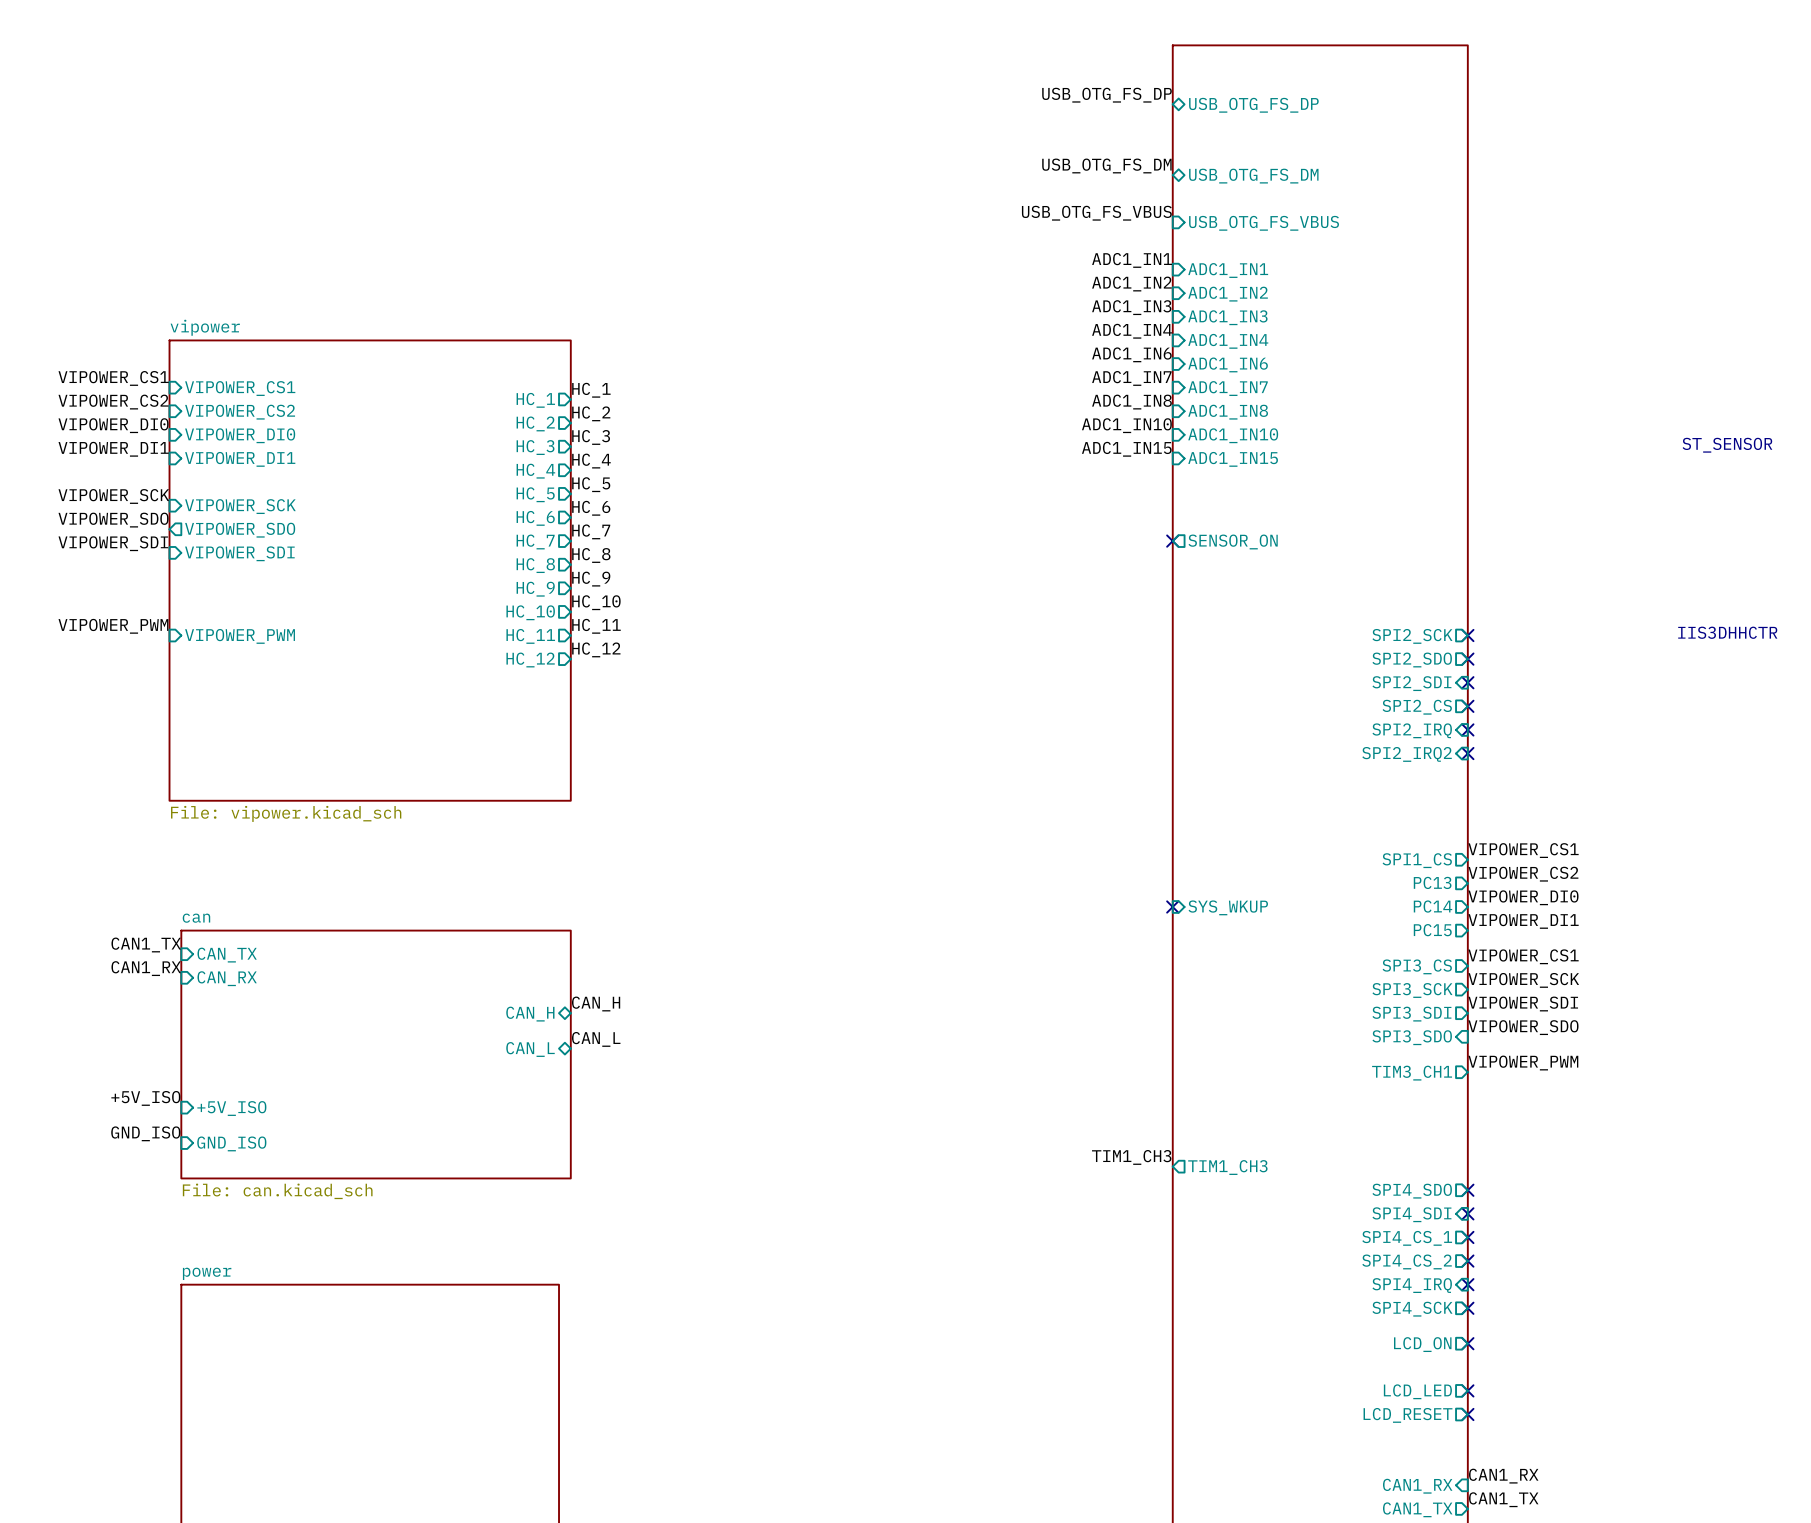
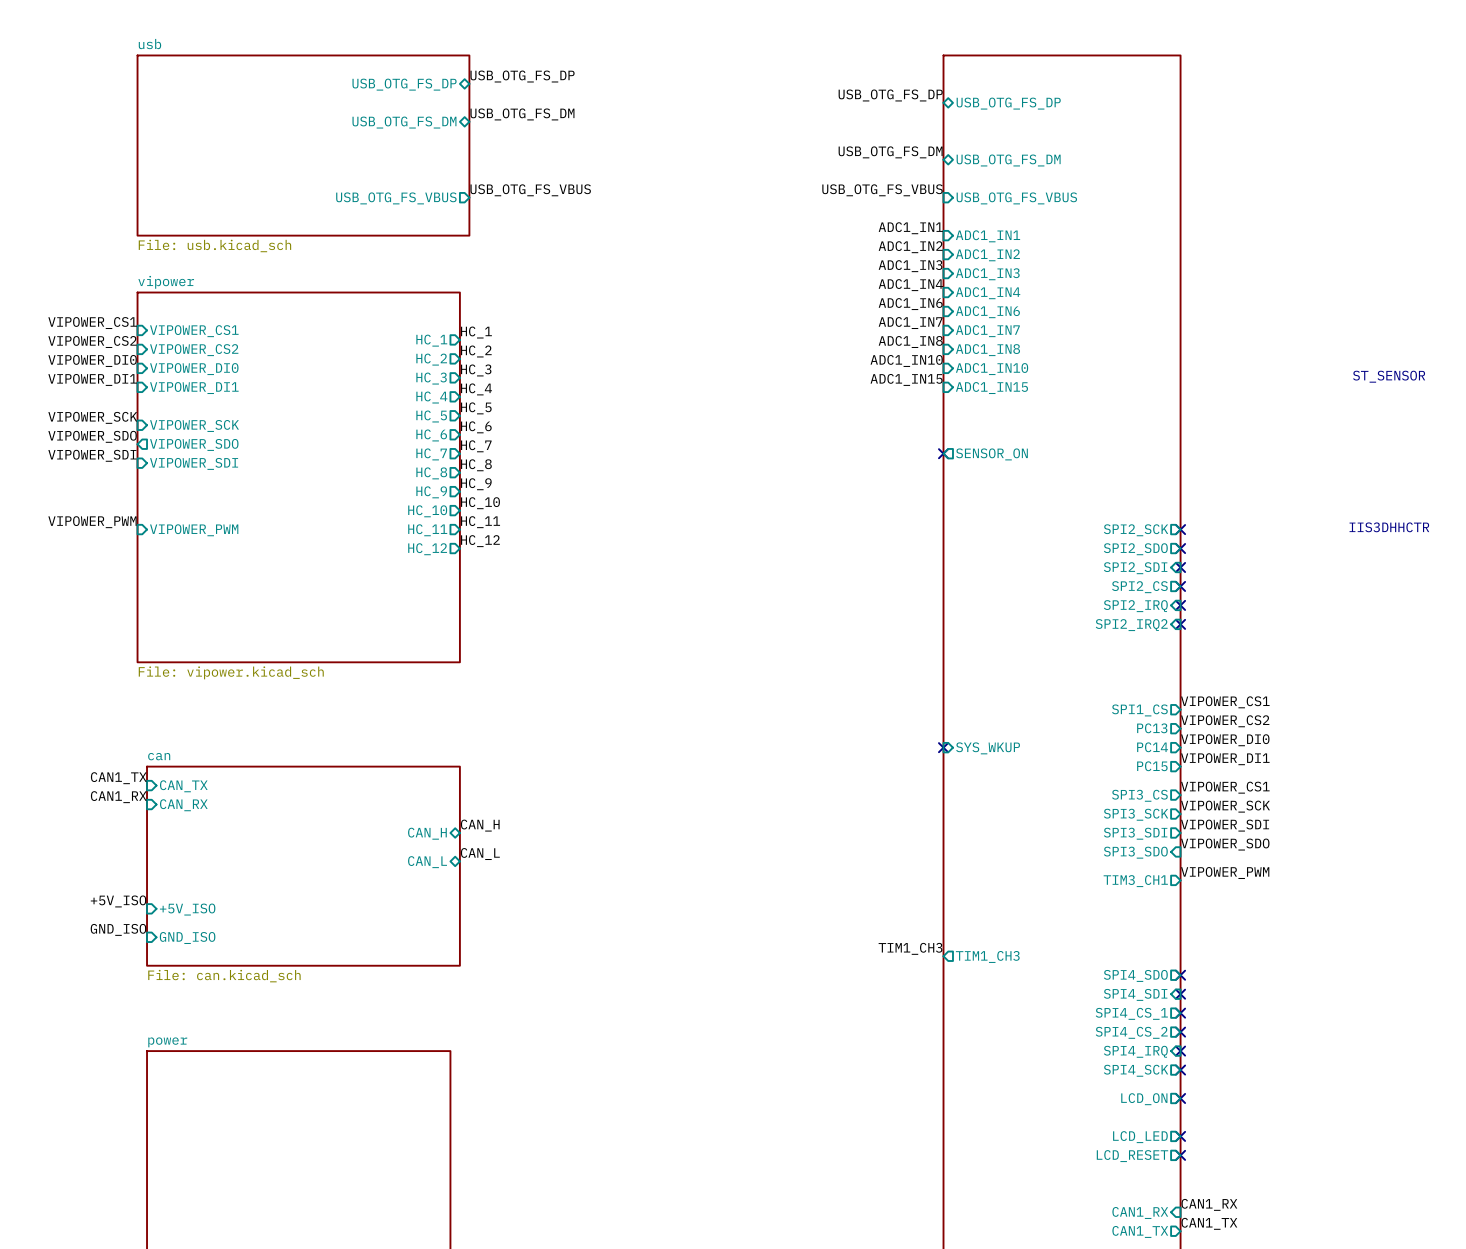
label: none -> USB_OTG_FS_DP (522, 76)
sheet pin: none -> USB_OTG_FS_DP (404, 84)
label: none -> USB_OTG_FS_DM (522, 114)
sheet pin: none -> USB_OTG_FS_DM (404, 122)
sheet usb: none -> File: usb.kicad_sch (303, 145)
label: none -> USB_OTG_FS_VBUS (530, 190)
sheet pin: none -> USB_OTG_FS_VBUS (396, 198)

